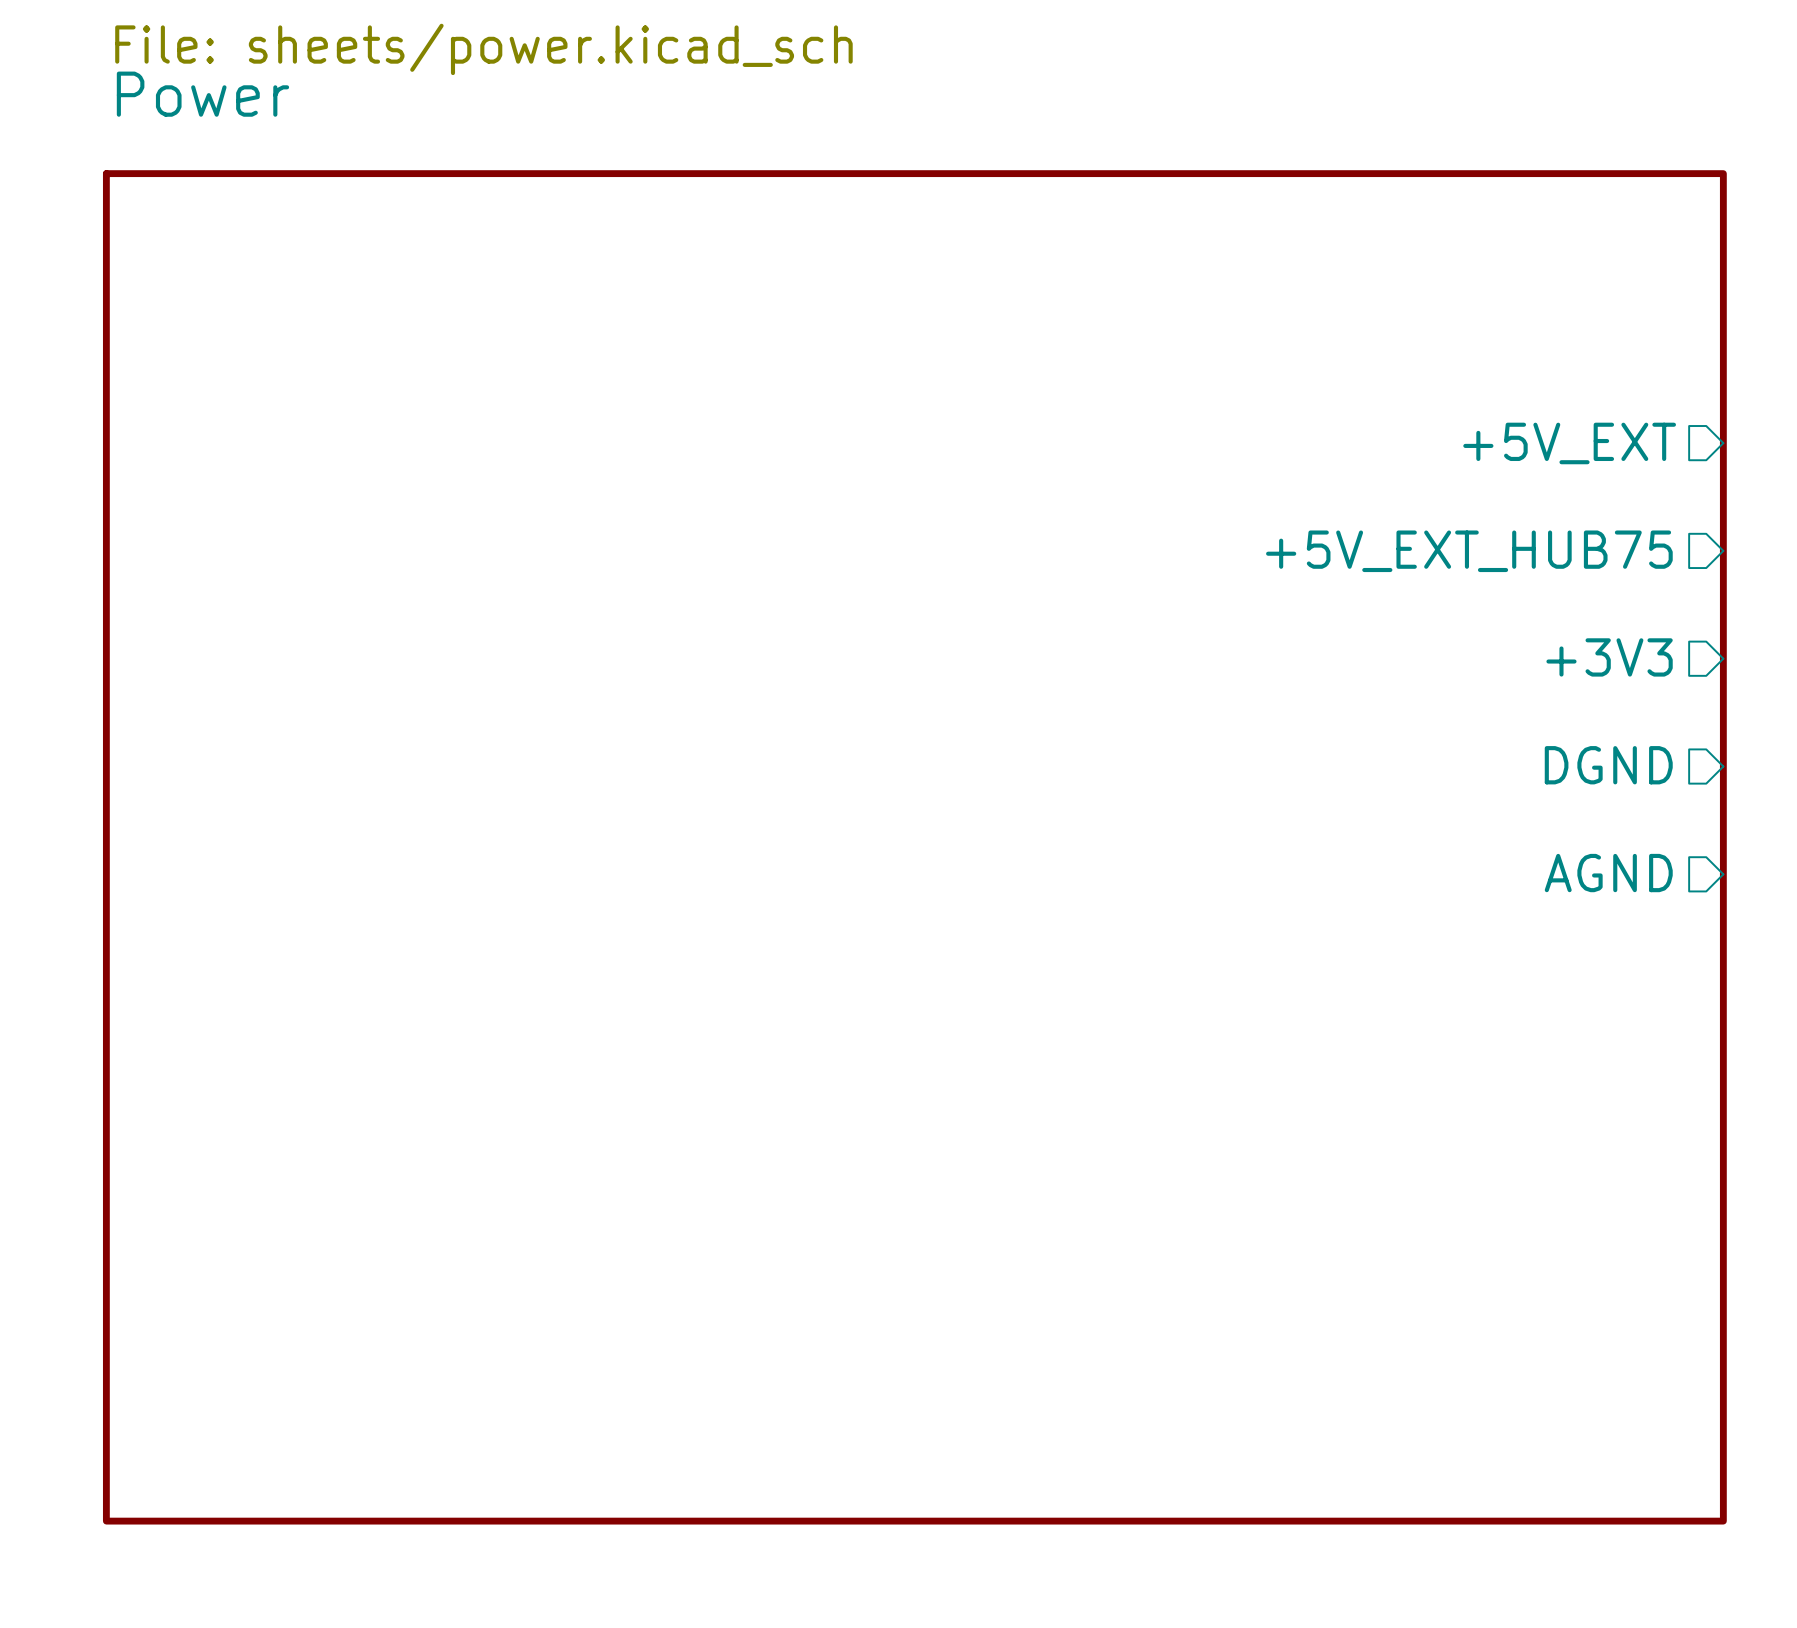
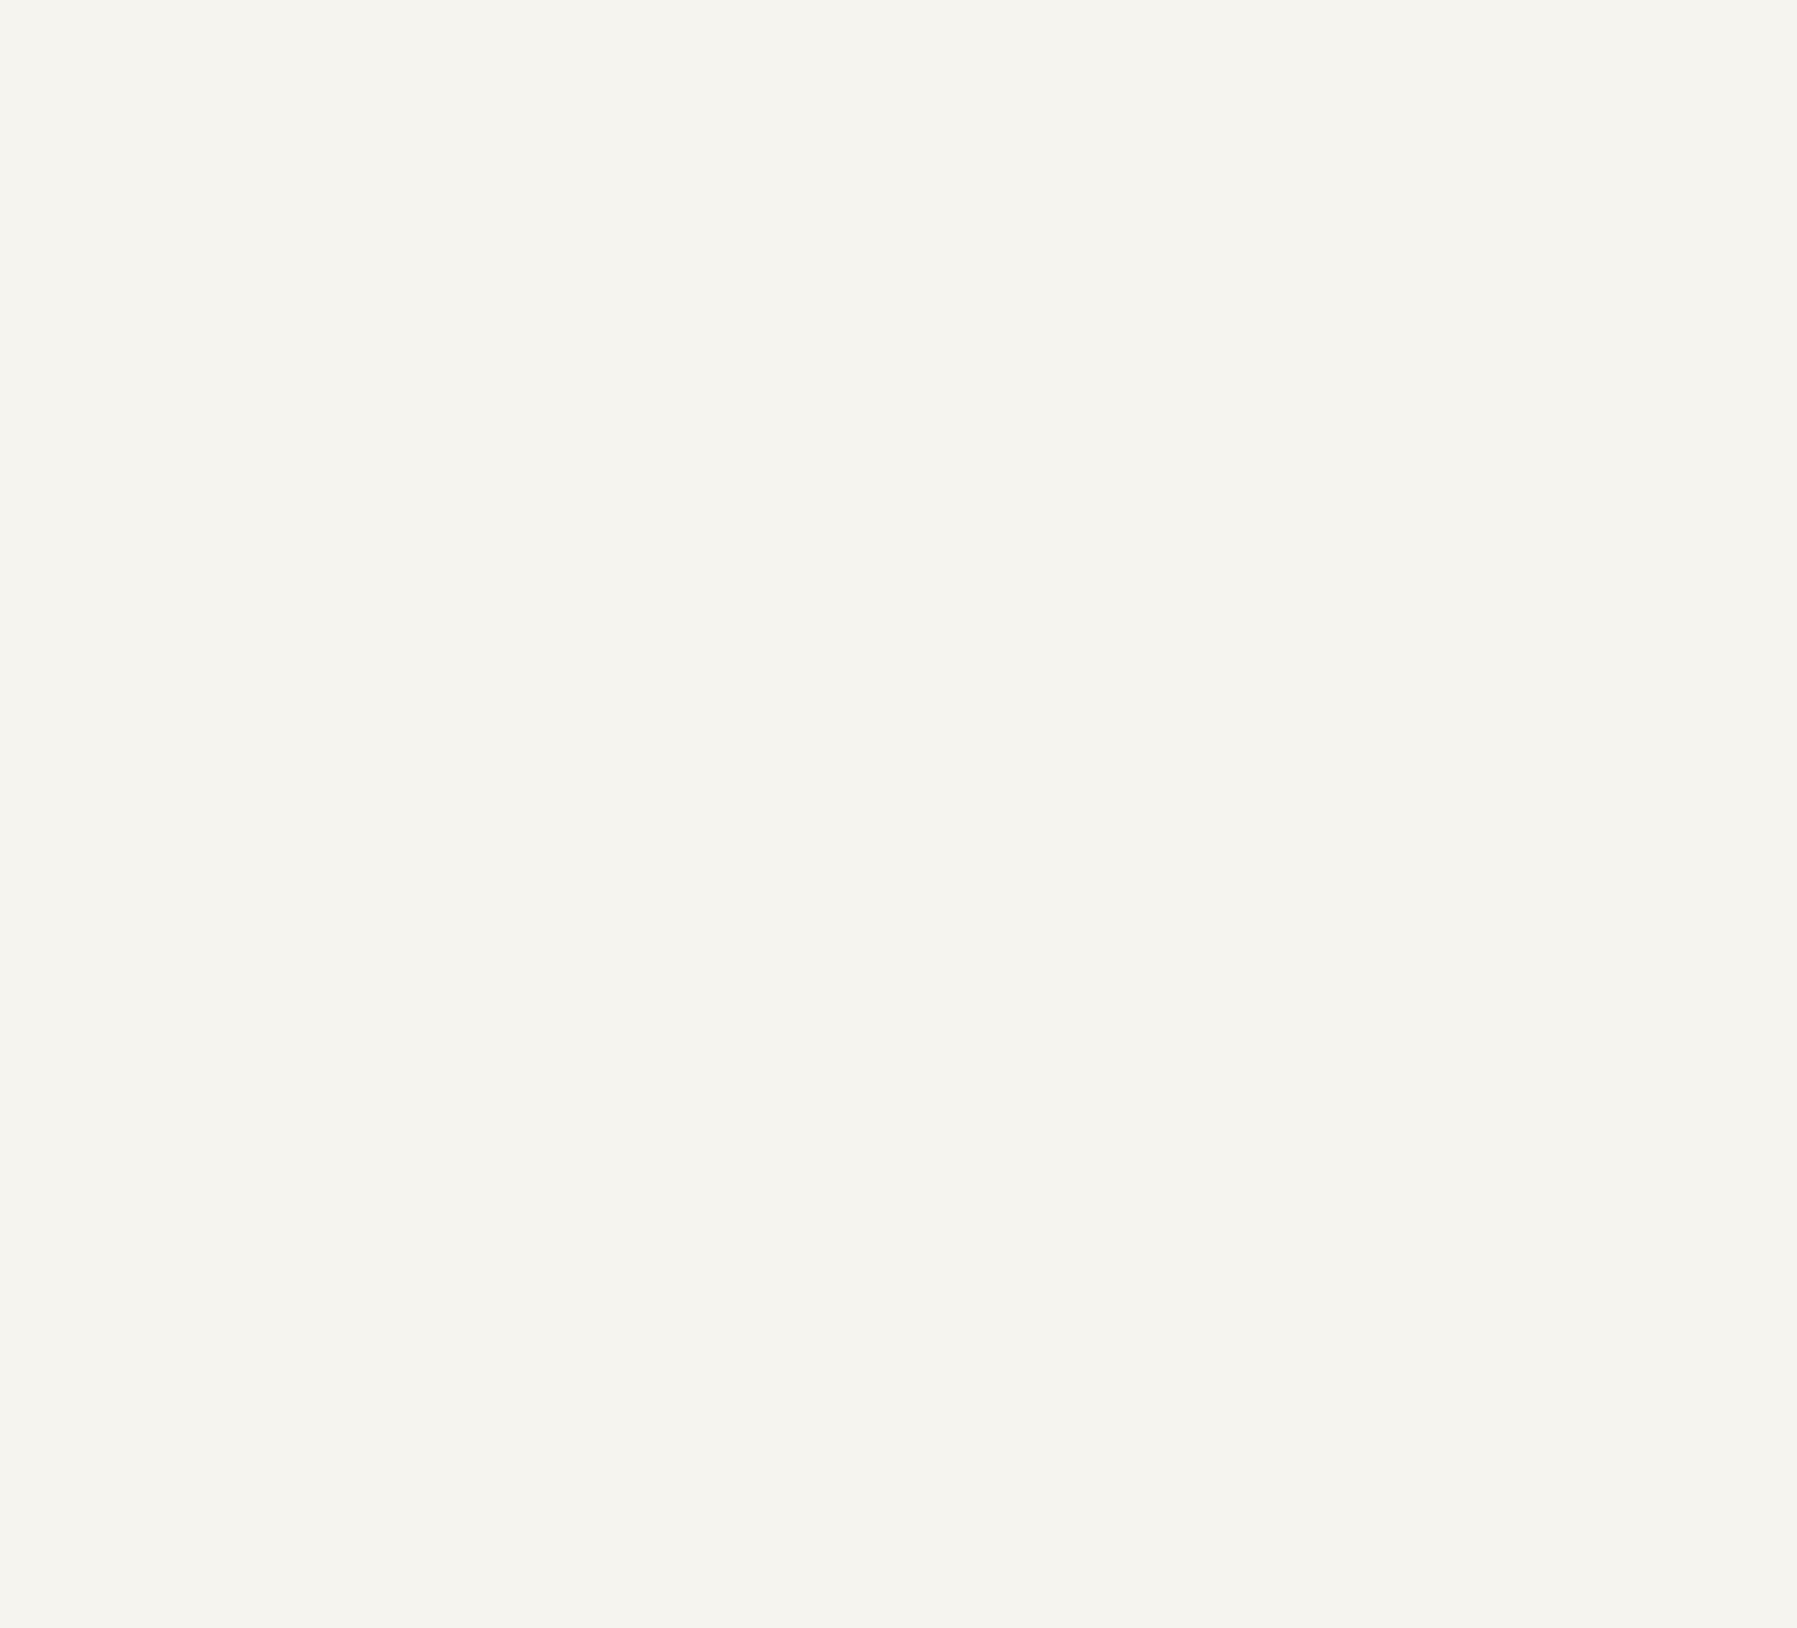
sheet pin: +5V_EXT (1569, 443) -> none
sheet pin: +5V_EXT_HUB75 (1469, 551) -> none
sheet pin: +3V3 (1609, 657) -> none
sheet pin: DGND (1608, 765) -> none
sheet Power: File: sheets/power.kicad_sch (914, 847) -> none
sheet pin: AGND (1608, 873) -> none

